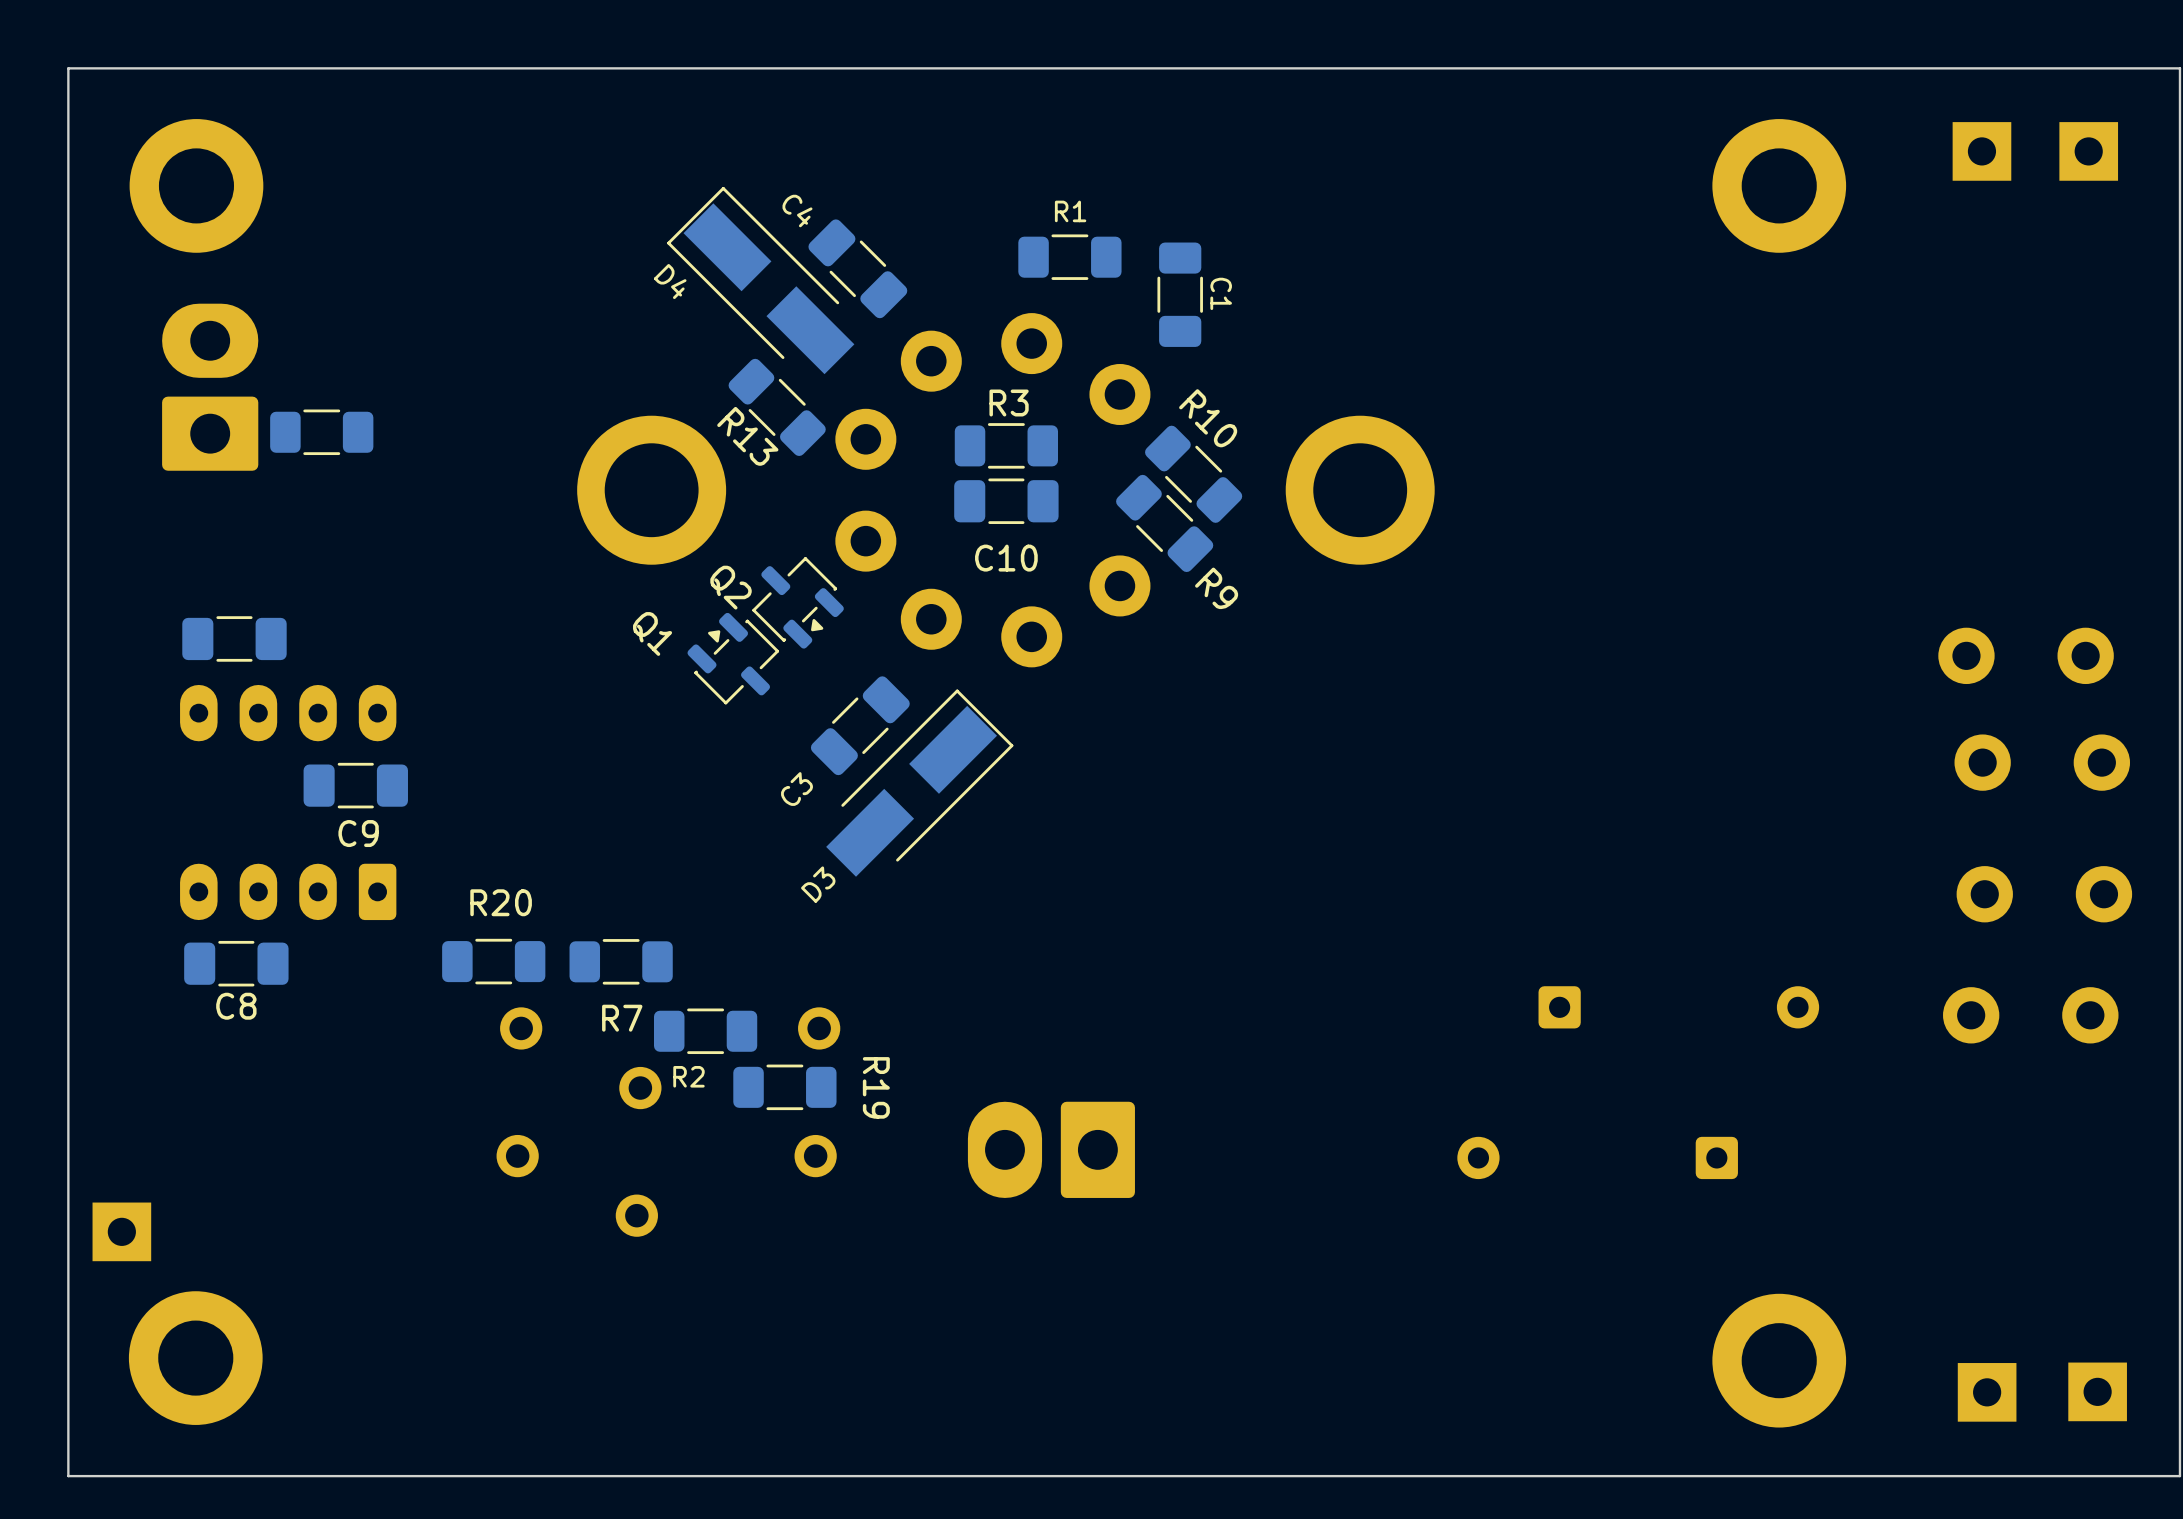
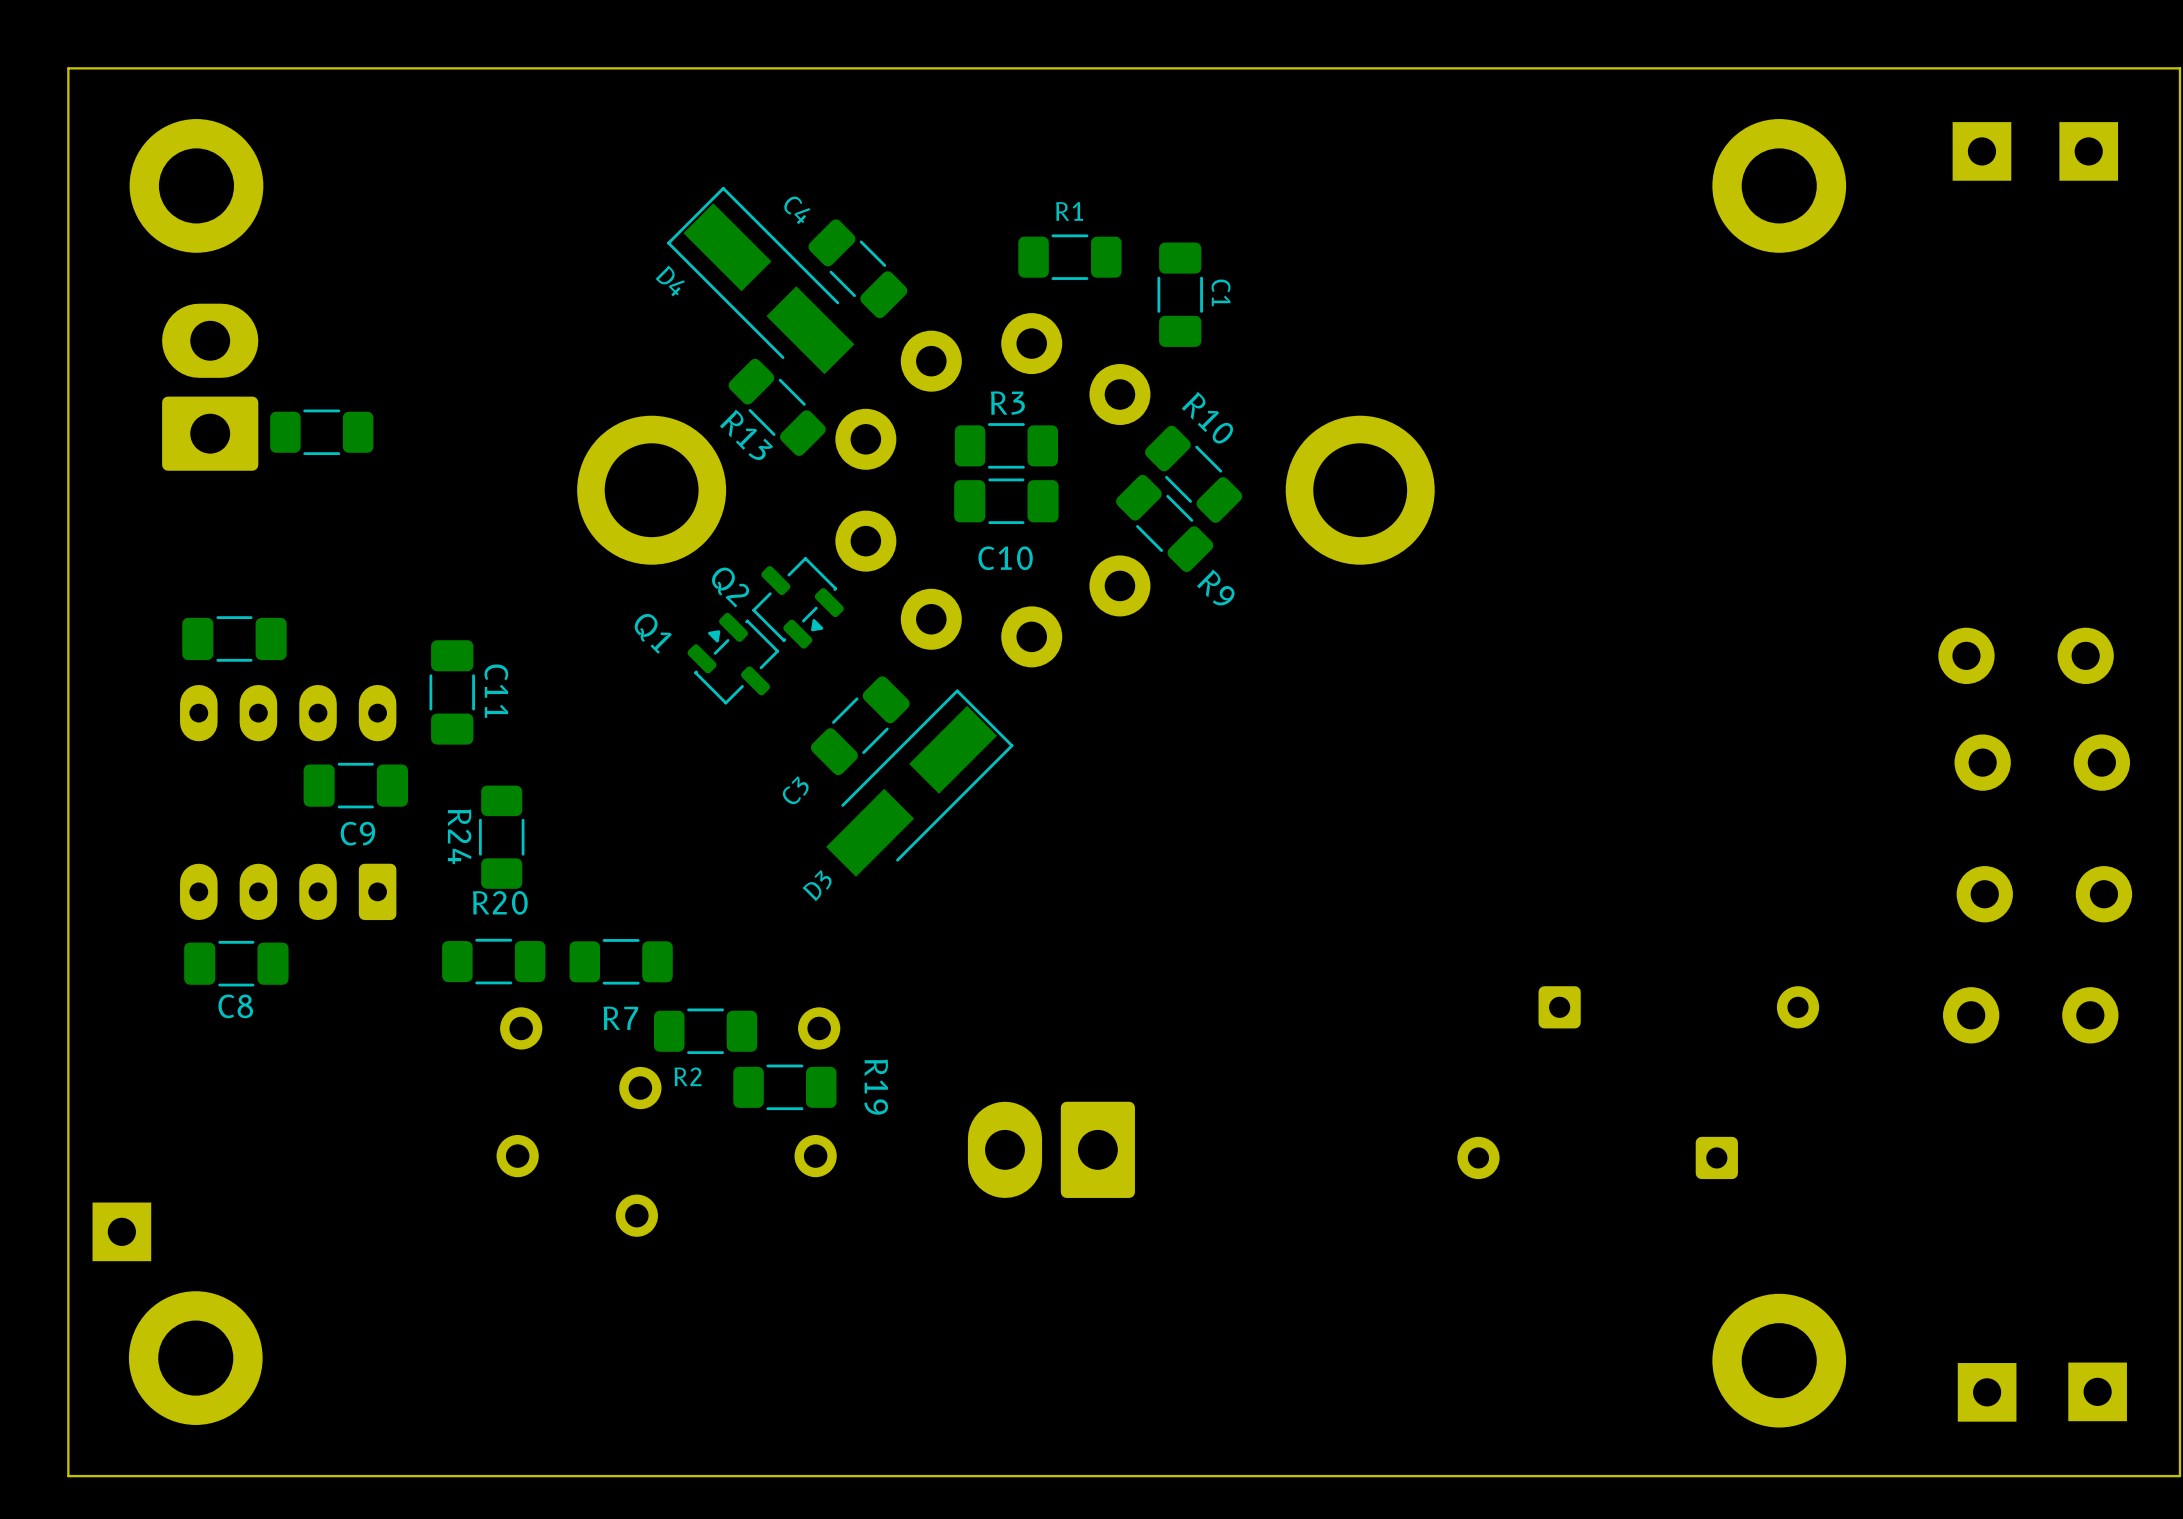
C11: none -> (452, 692)
R24: none -> (501, 837)

